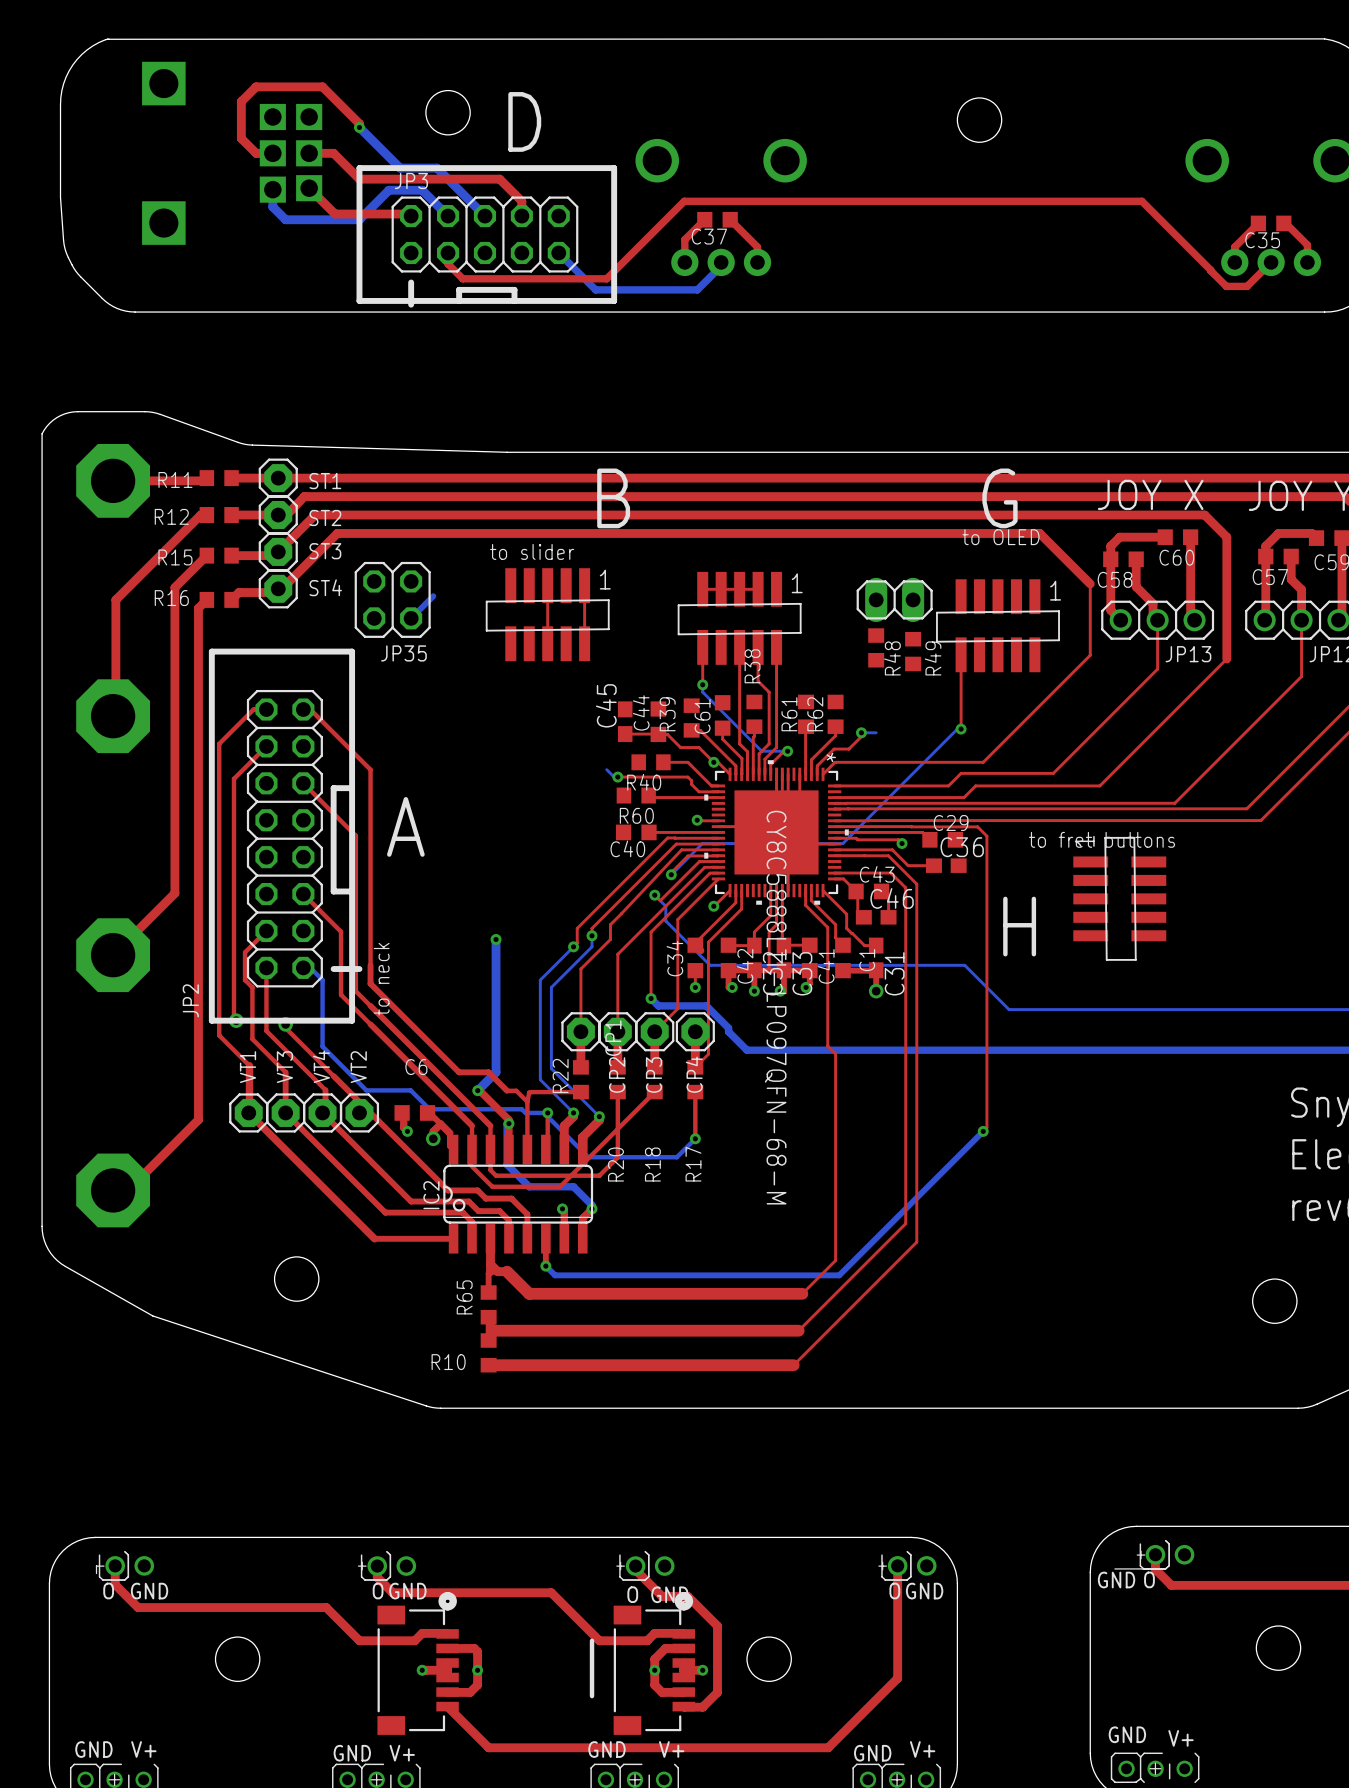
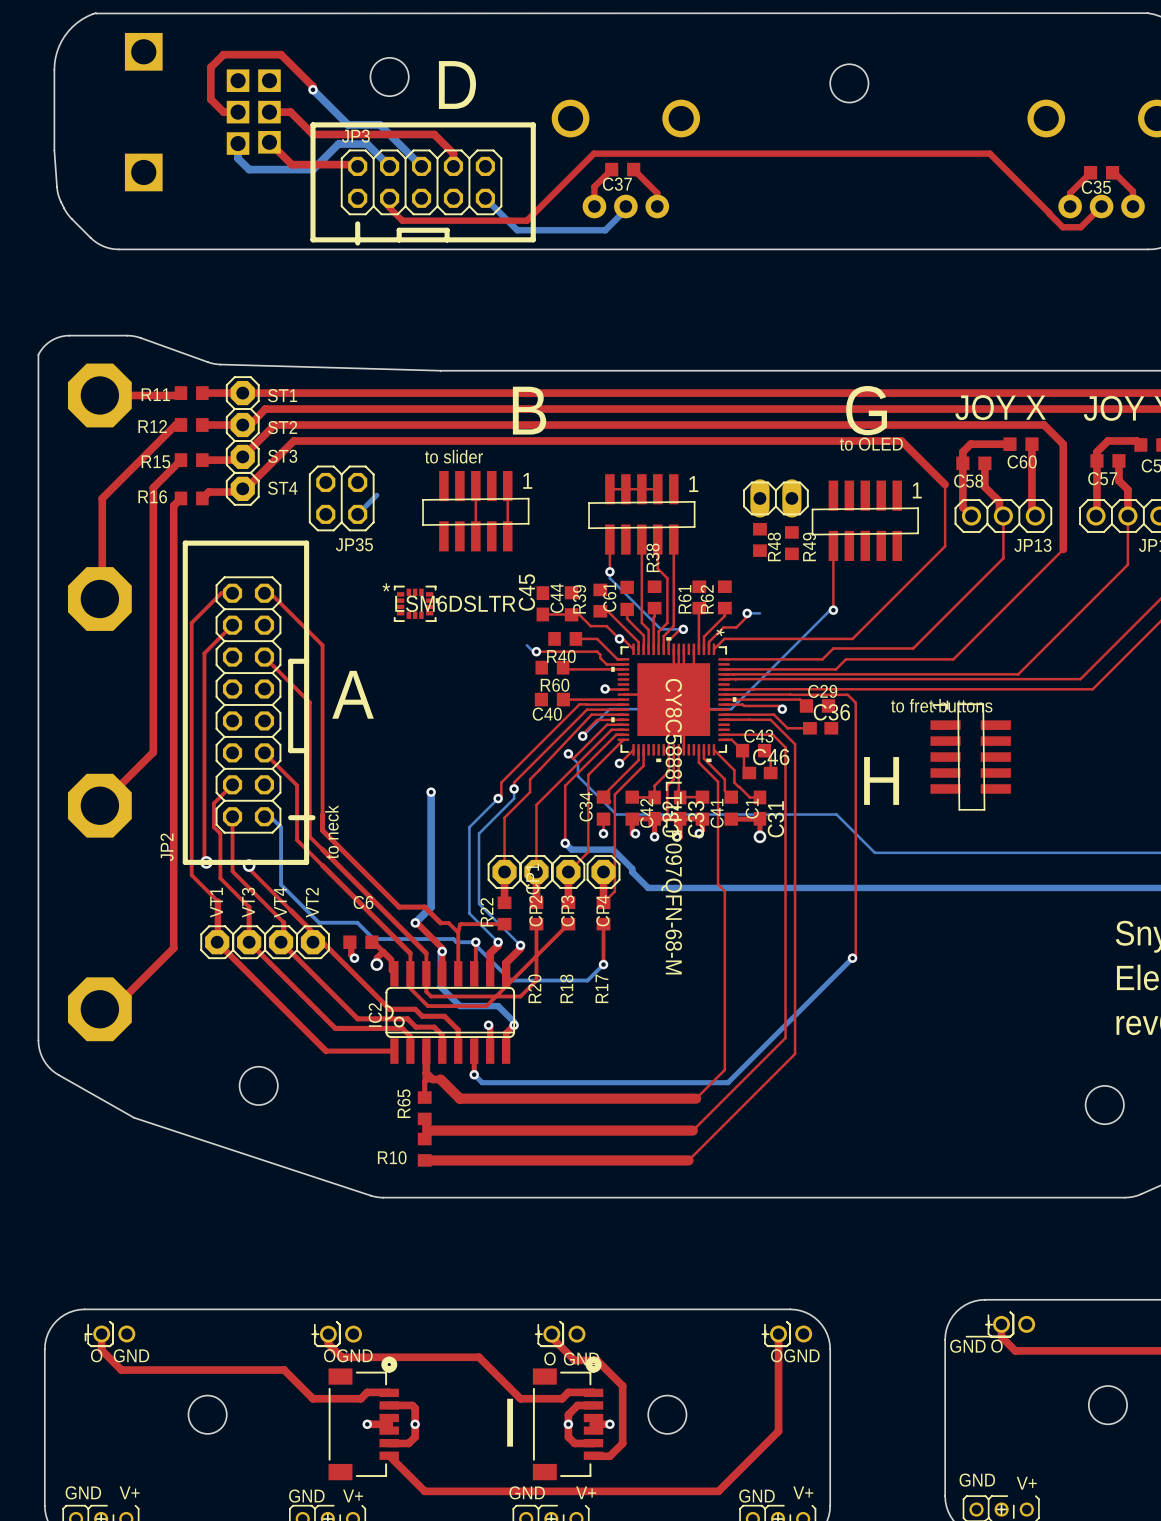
part: none -> LSM6DSLTR (416, 603)

